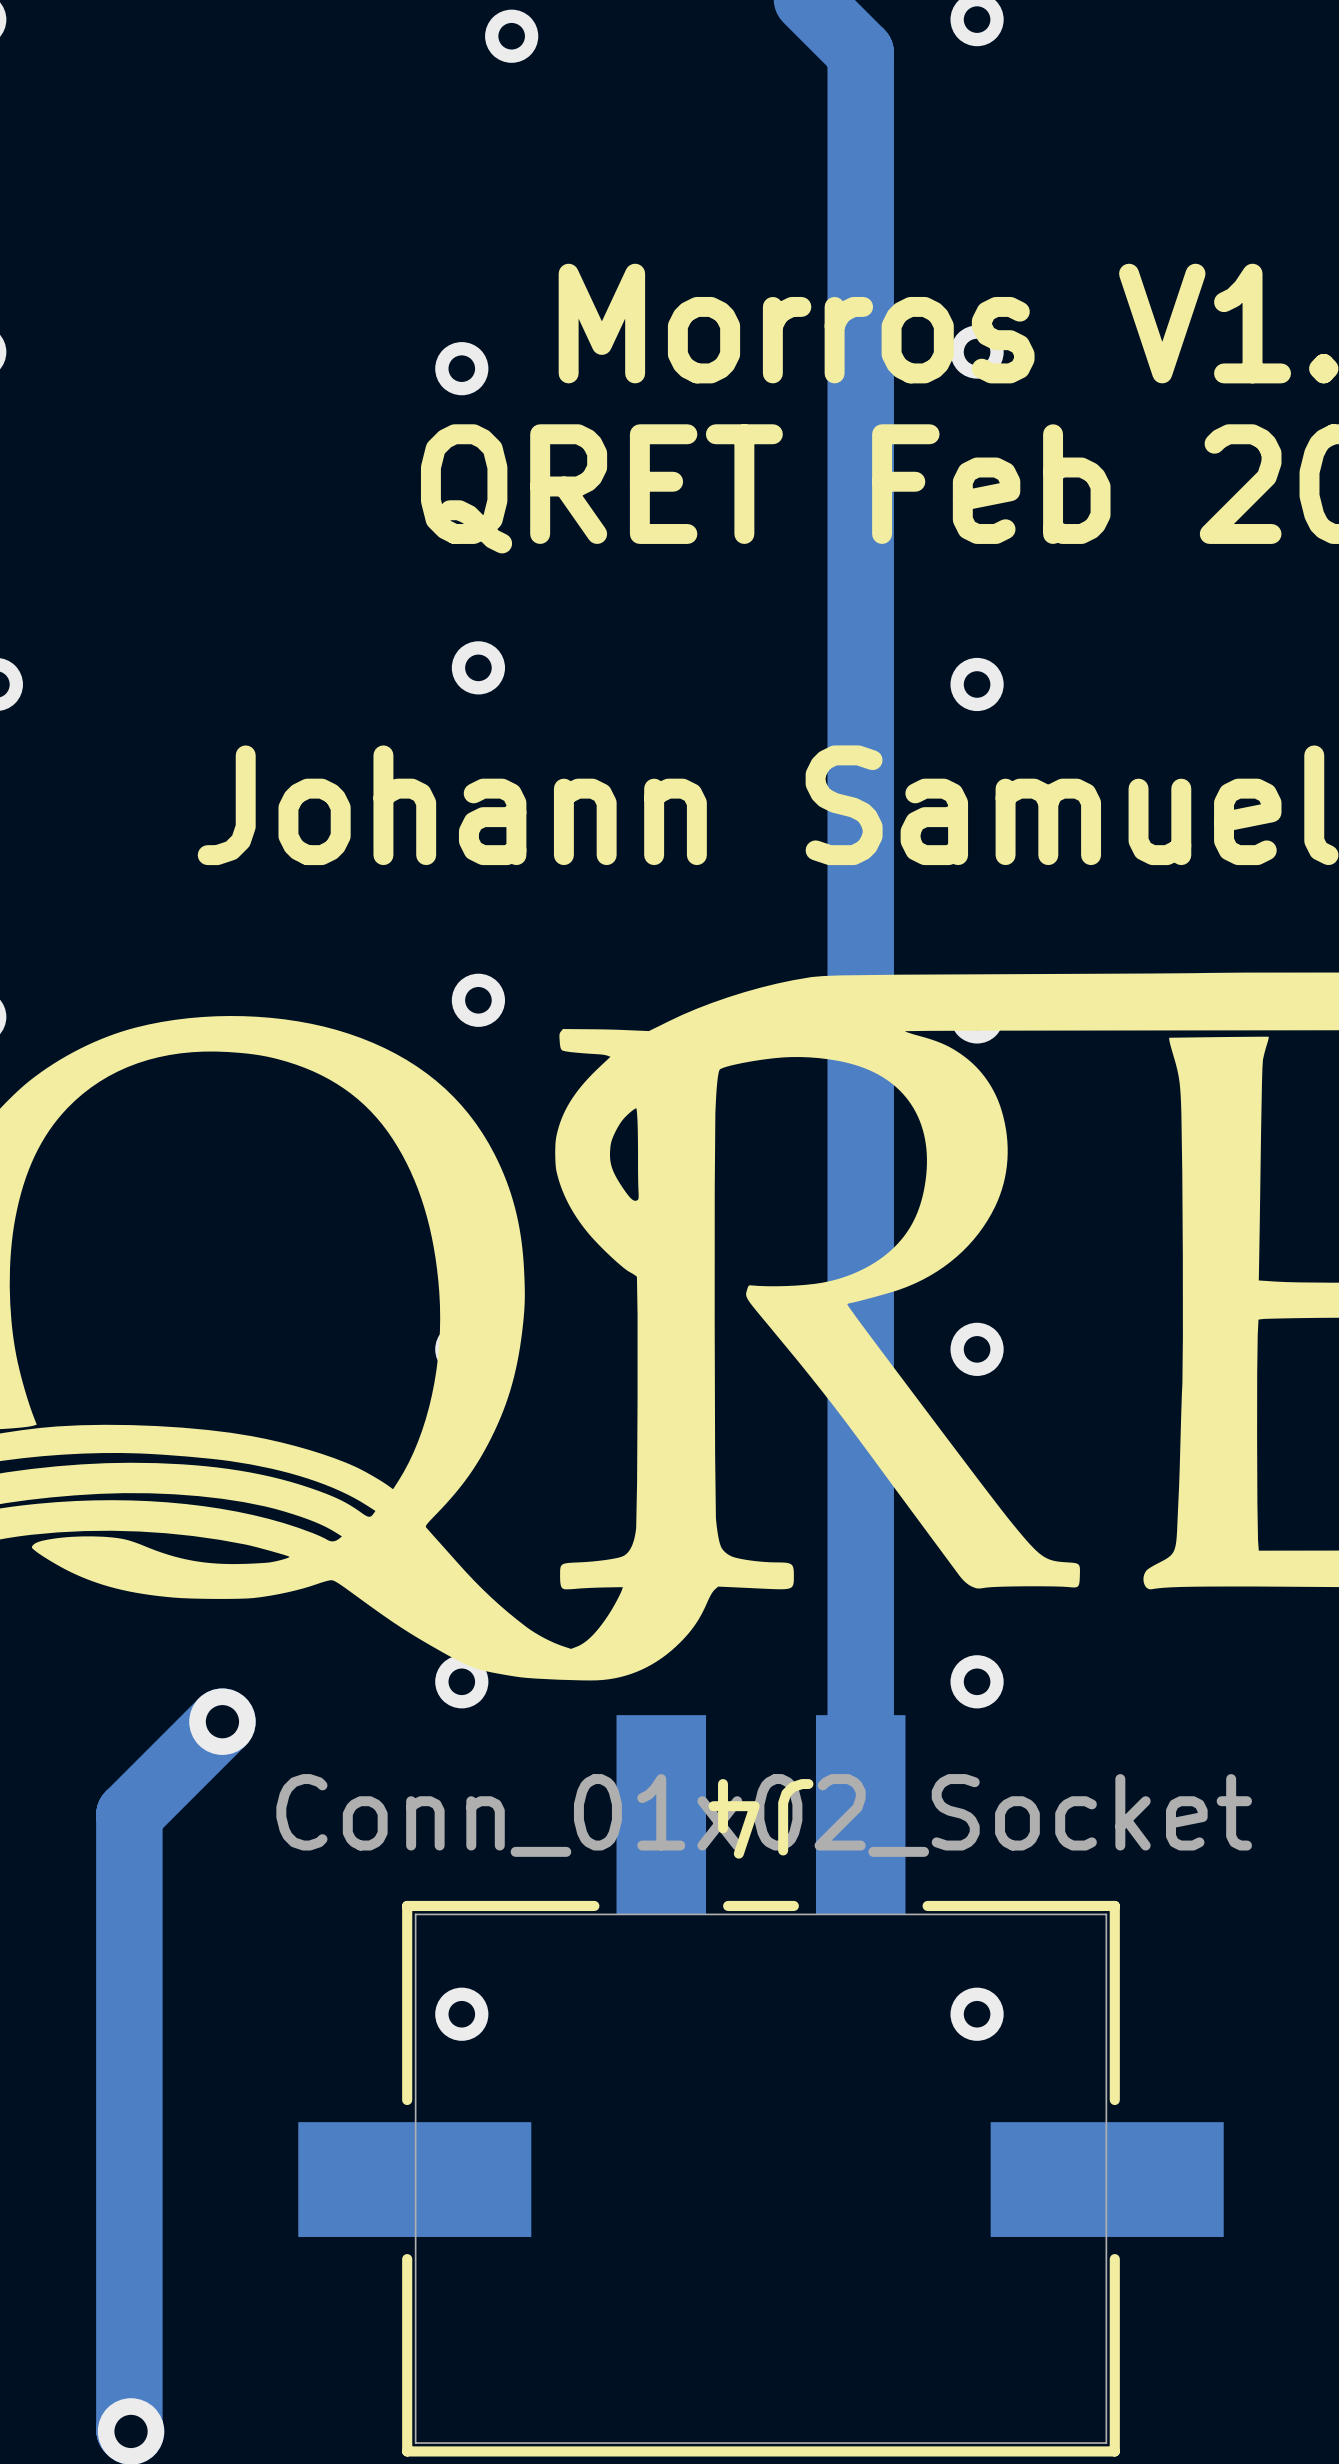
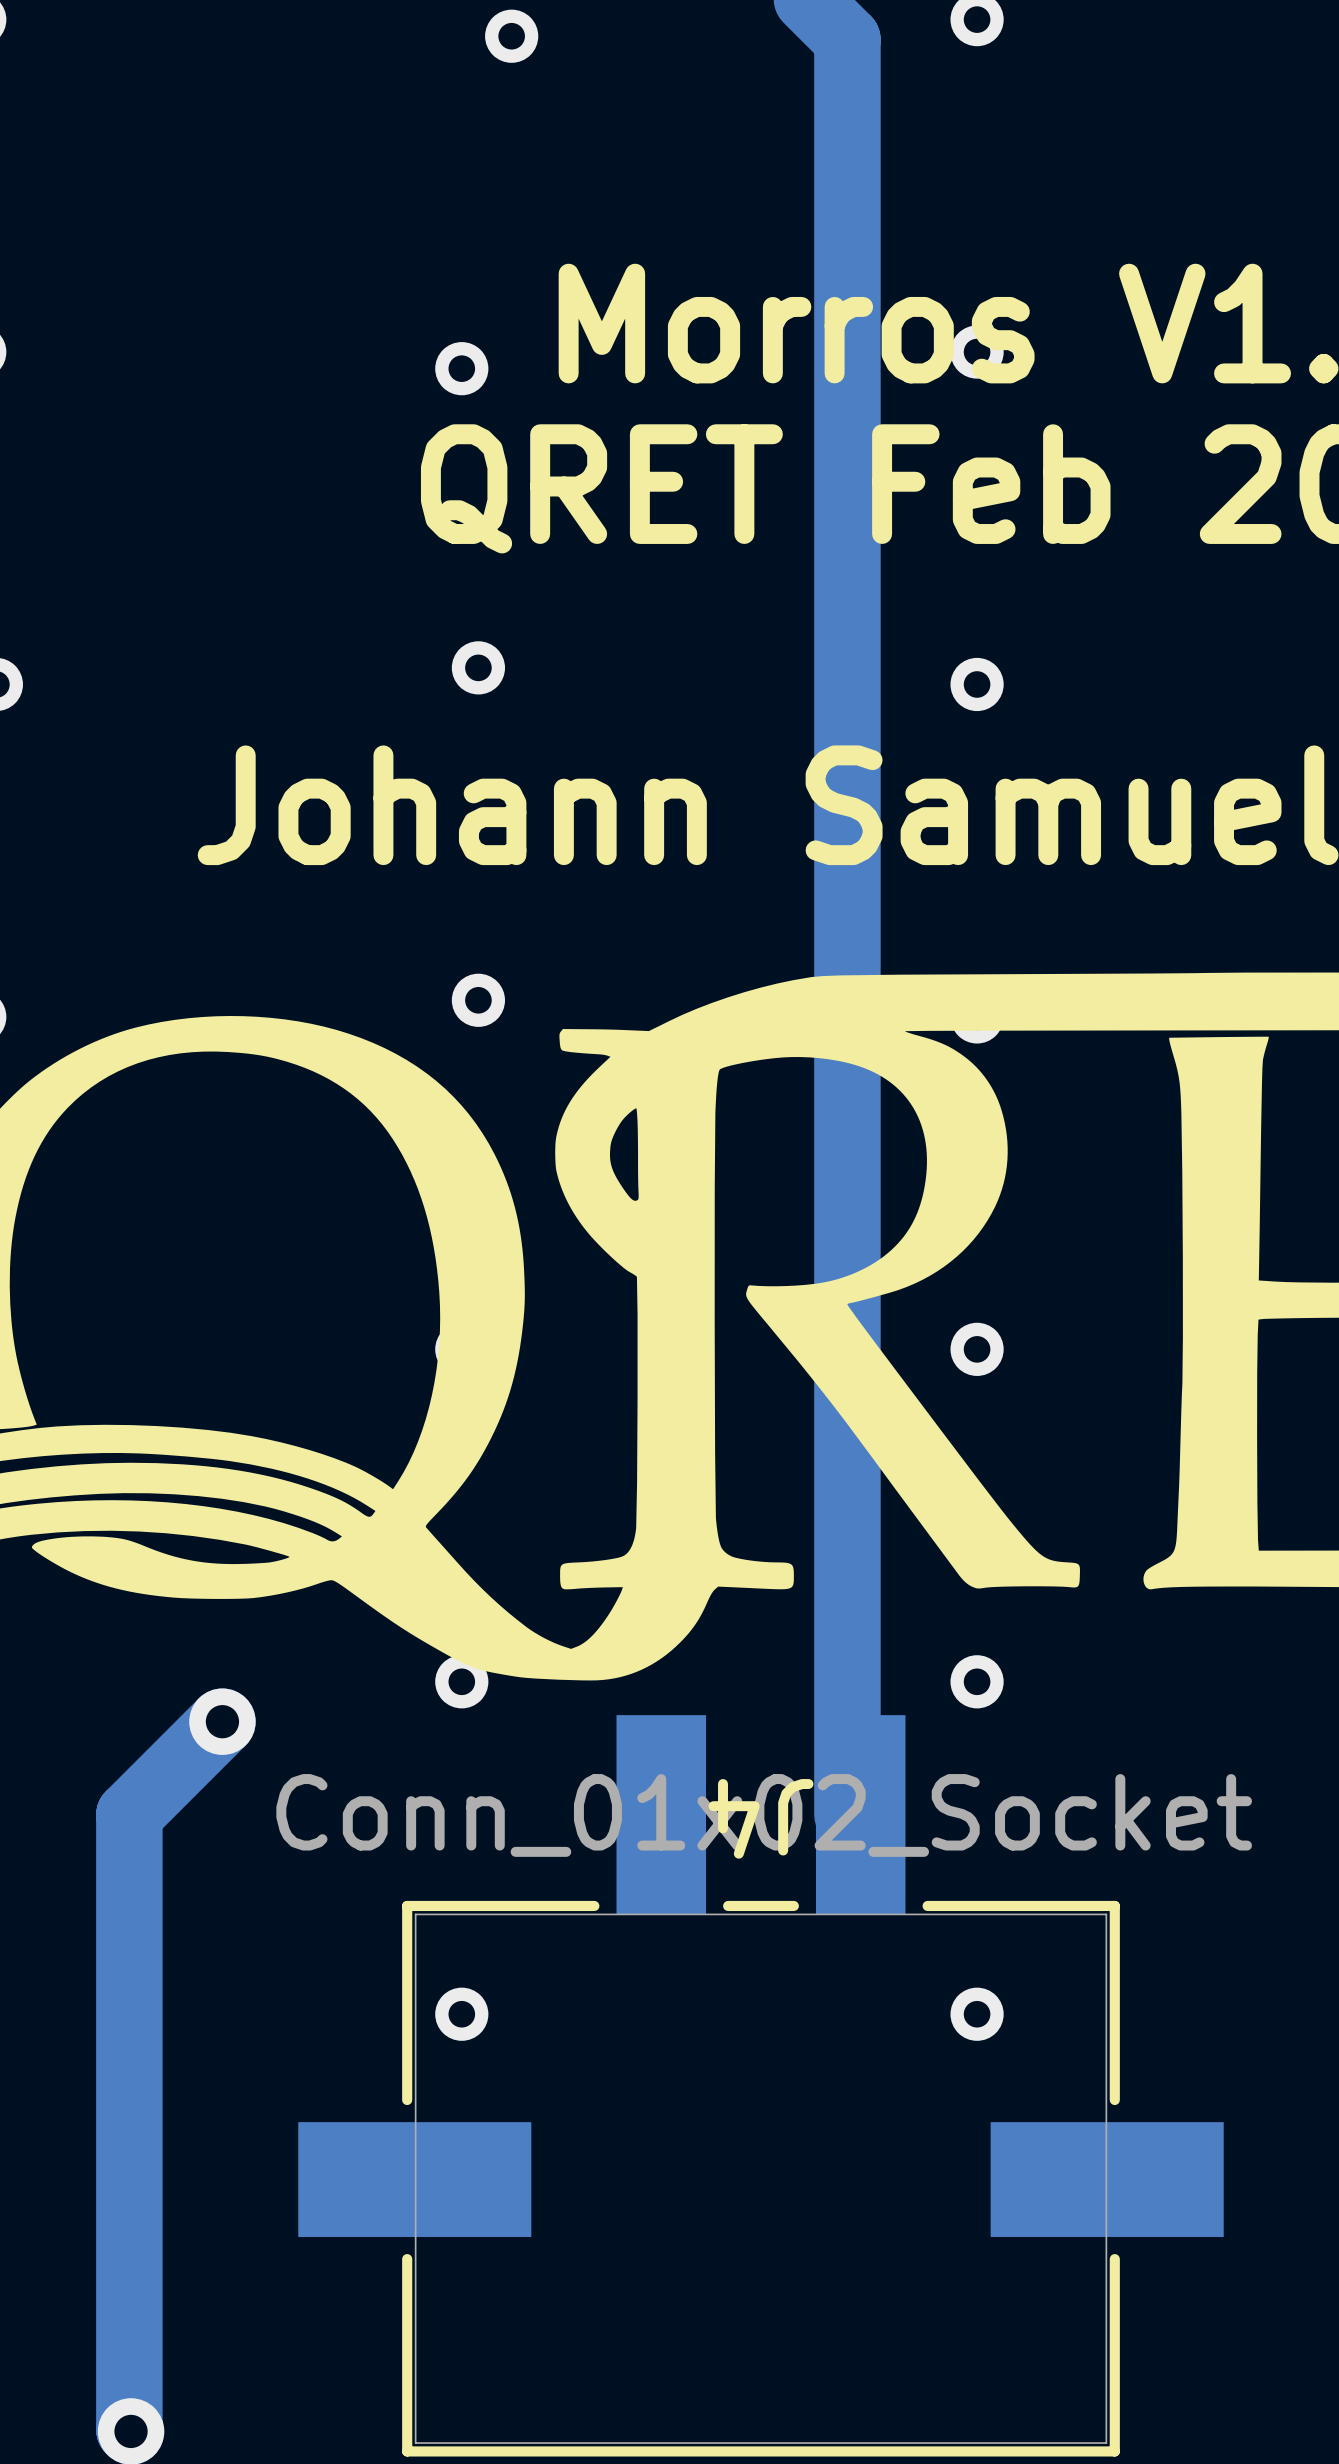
track: (847, 39) (860, 52) (860, 1814) -> (847, 39) (847, 1814)

